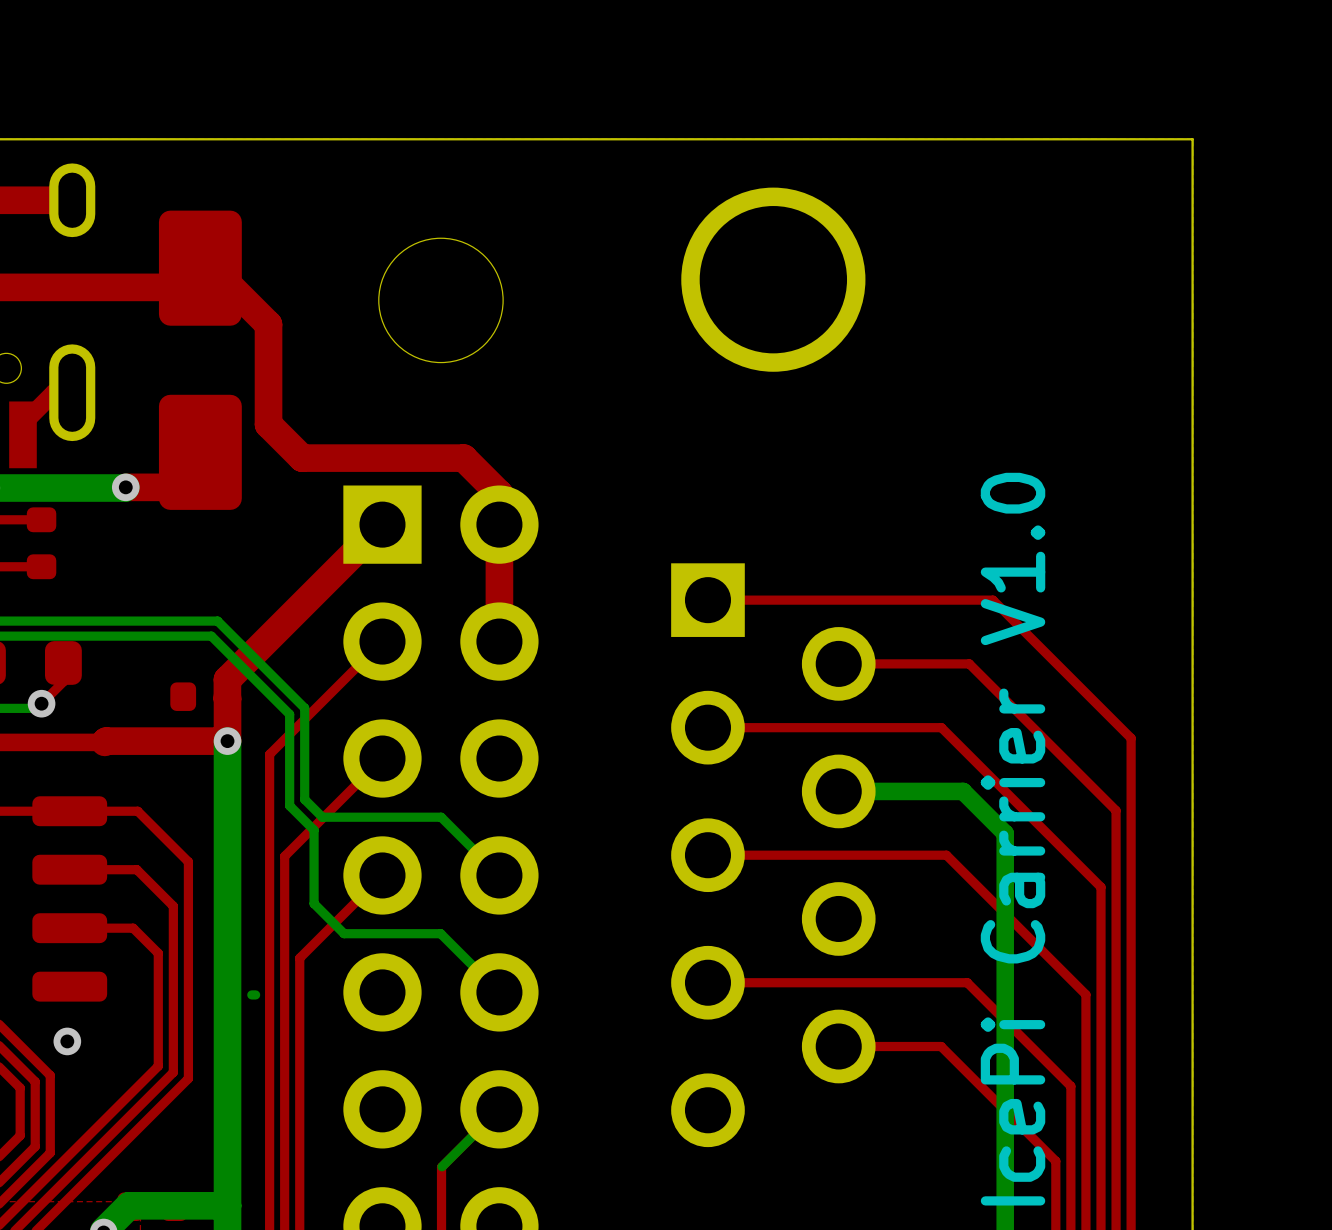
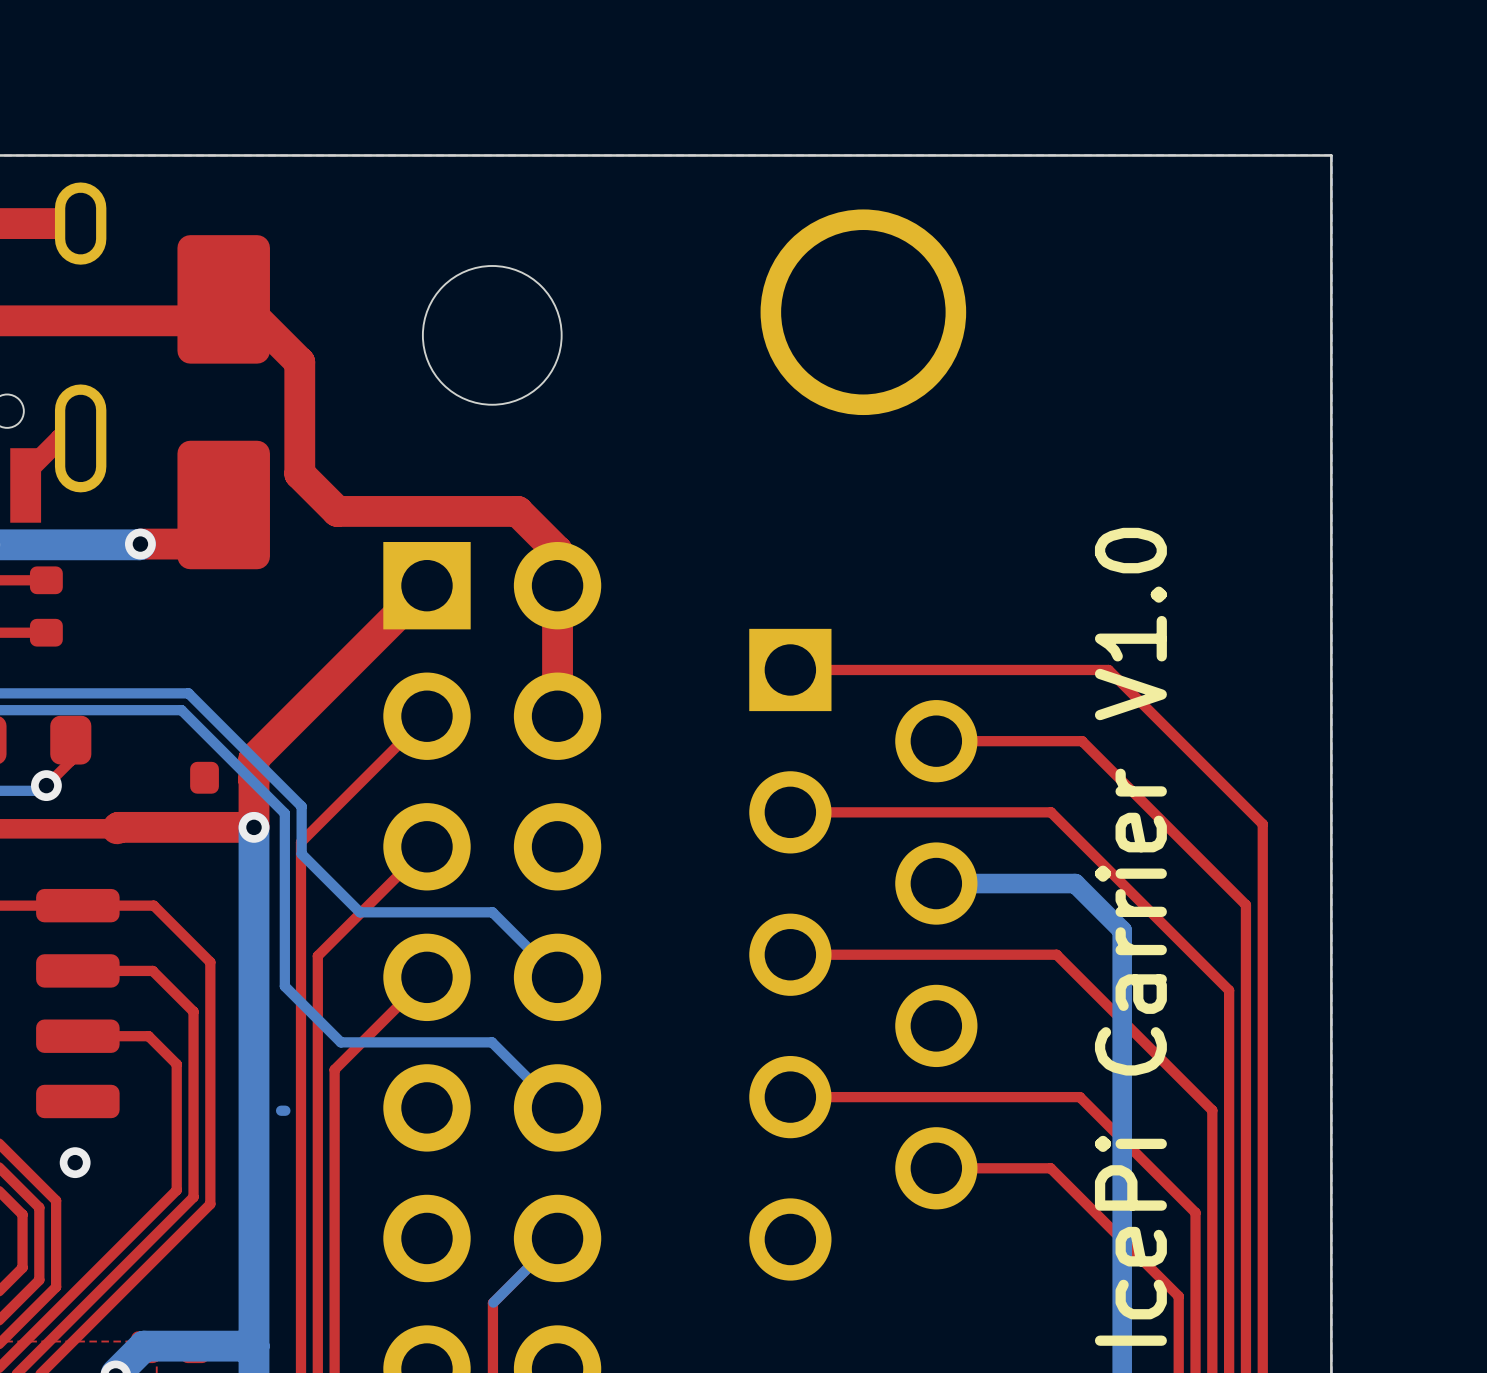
bottom track: (168, 621) (217, 621) (304, 708) (304, 799) -> (188, 693) (301, 806) (301, 854) (340, 892)
bottom track: (162, 636) (211, 636) (289, 714) (289, 805) (314, 830) (314, 903) (344, 933) -> (181, 710) (284, 813) (284, 986) (340, 1042) (384, 1042)

